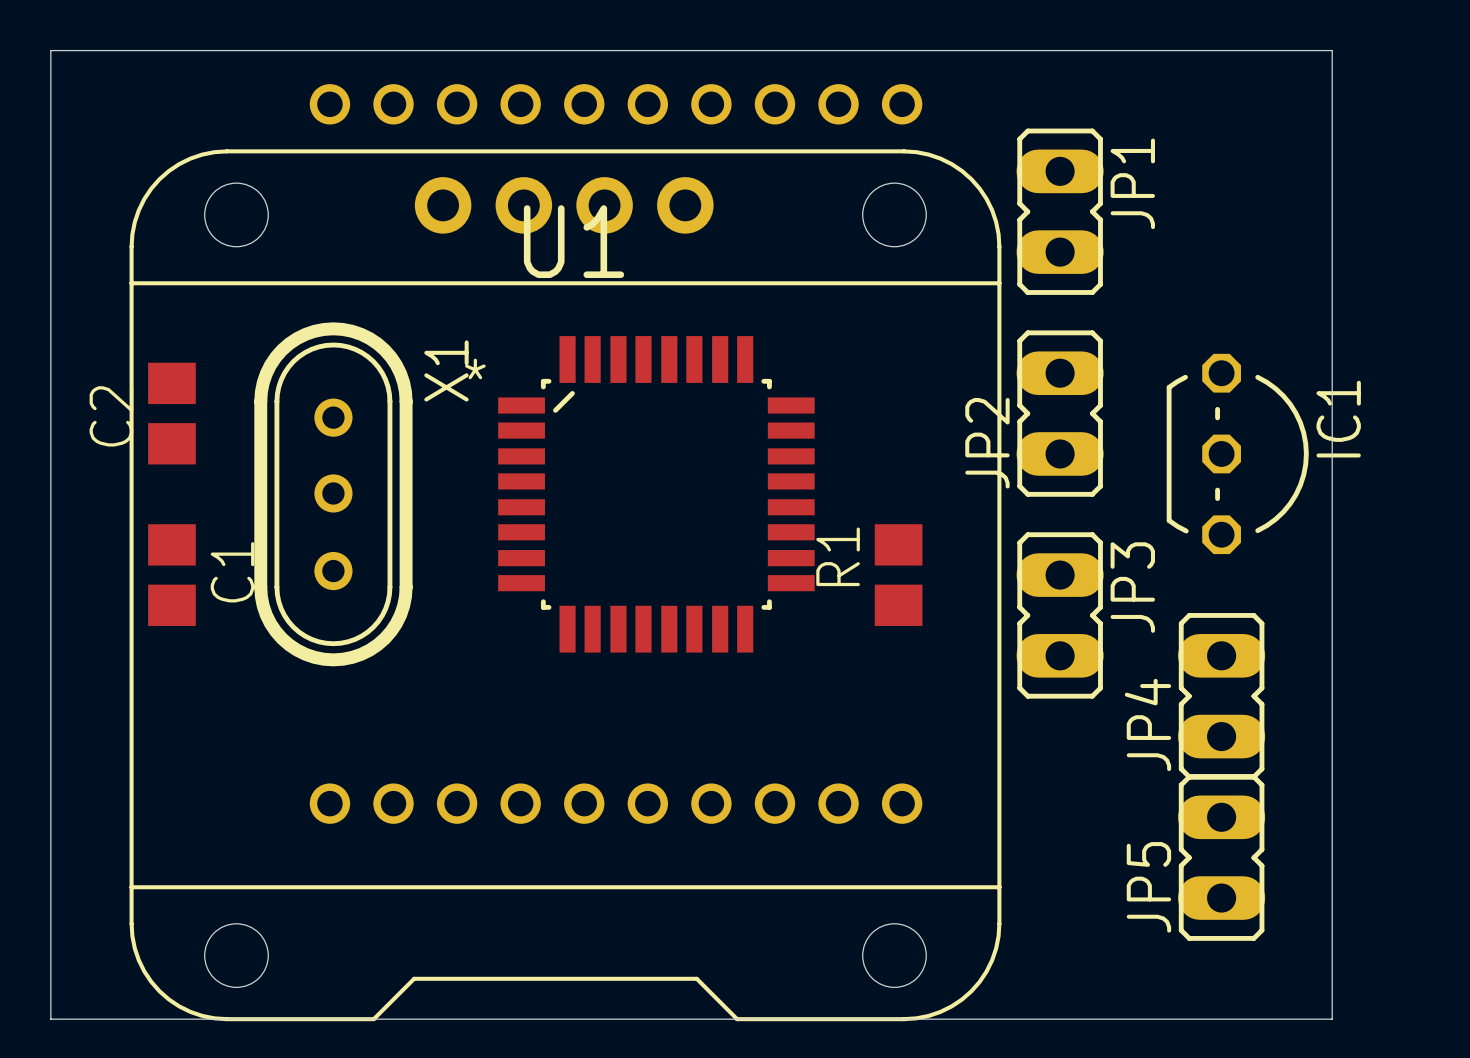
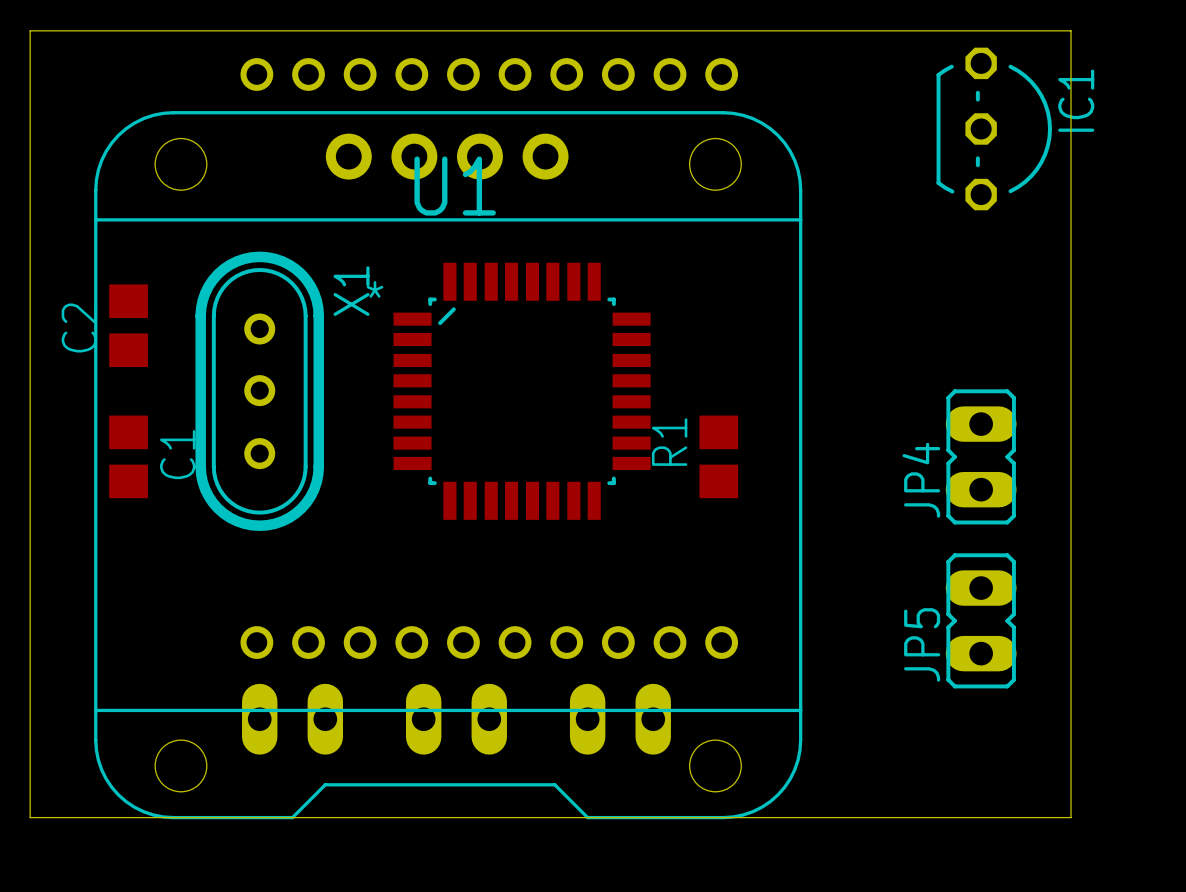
JP1: (1060, 211) -> none
JP2 side: top (1060, 413) -> bottom (456, 719)
IC1 position: (1237, 453) -> (994, 128)
JP3 side: top (1060, 615) -> bottom (620, 719)
JP4 position: (1221, 696) -> (981, 456)
JP5 position: (1221, 857) -> (981, 620)
part: none -> (292, 719)

